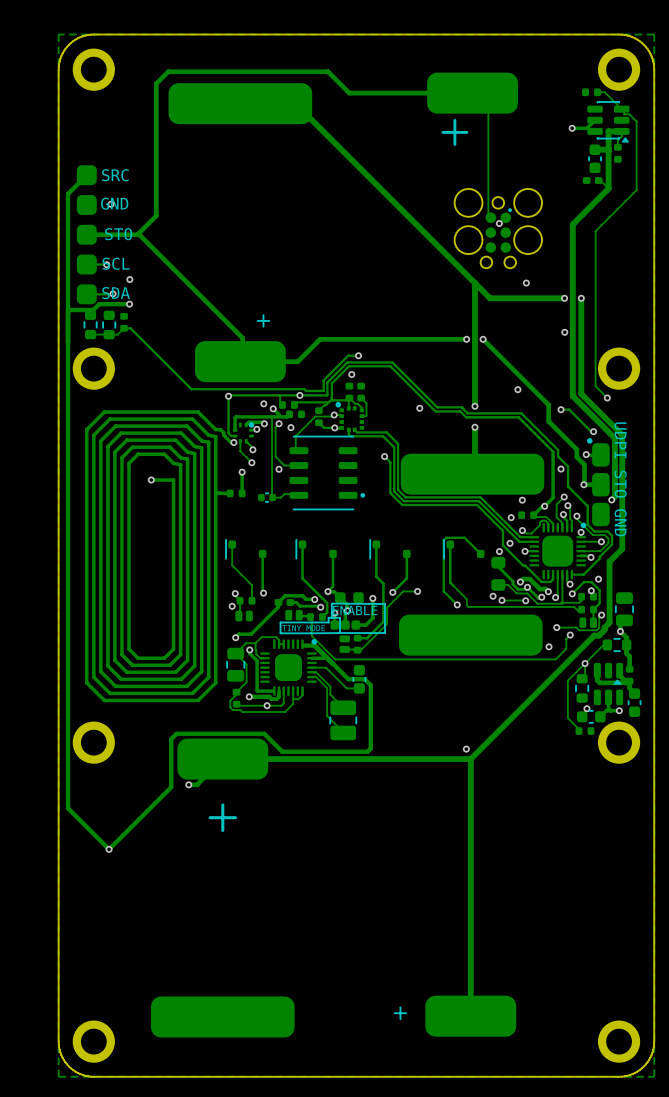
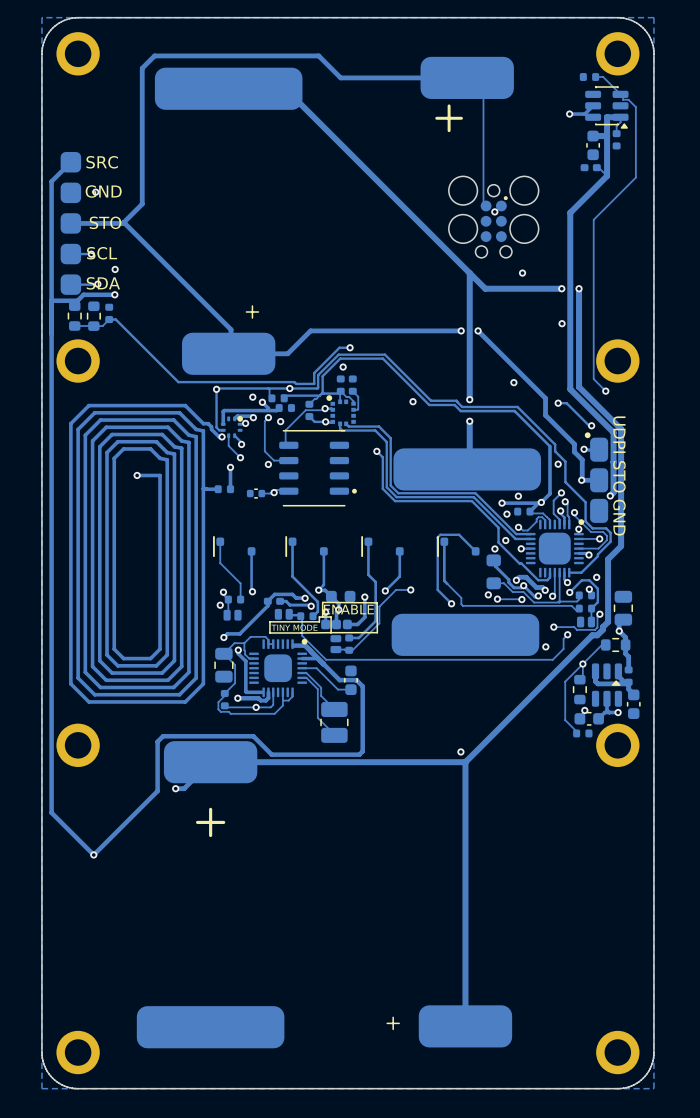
track: (272, 416) (272, 497) -> none
via: none -> (274, 492)
via: none -> (502, 503)
track: none -> (541, 502) (502, 503)

